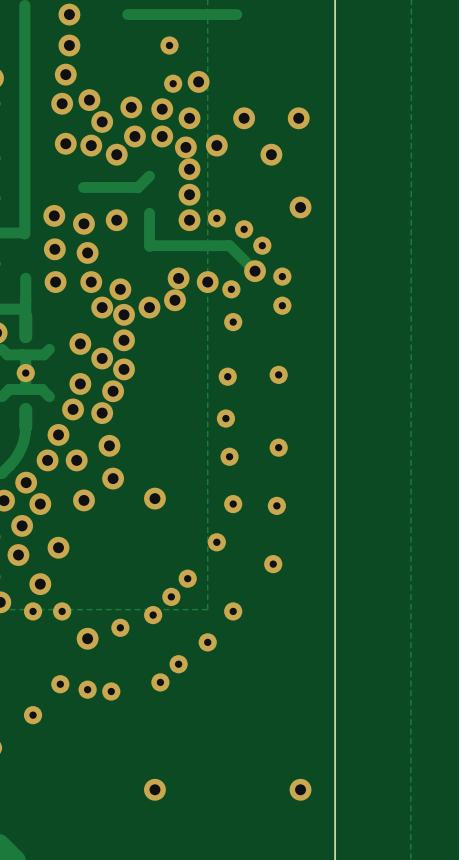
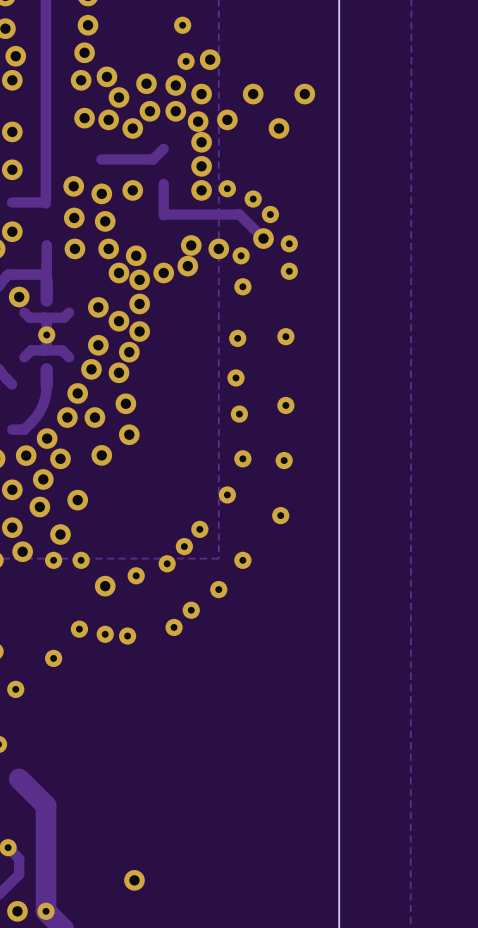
via: (300, 207) -> none
via: (154, 498) -> none
via: (154, 789) -> none
via: (300, 789) -> none

